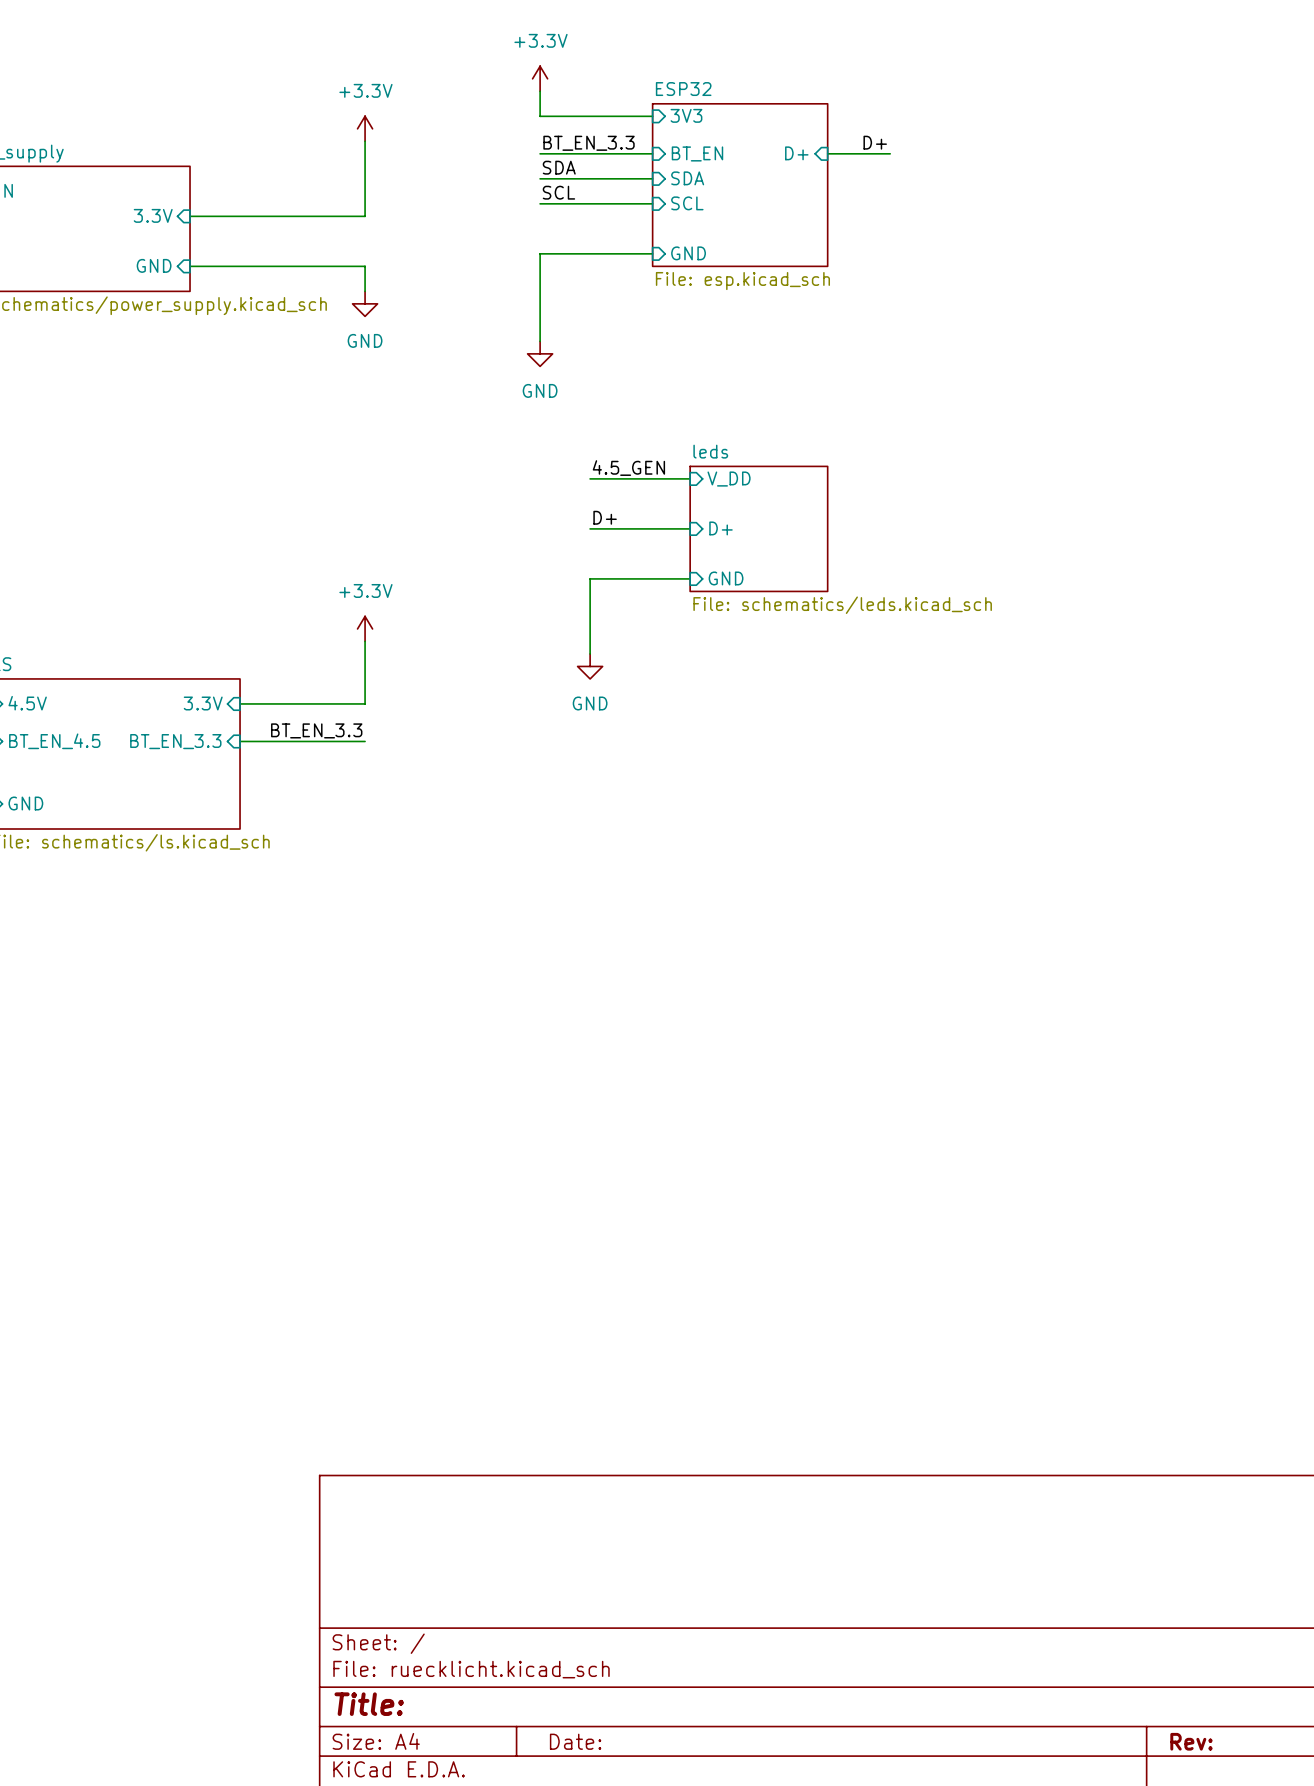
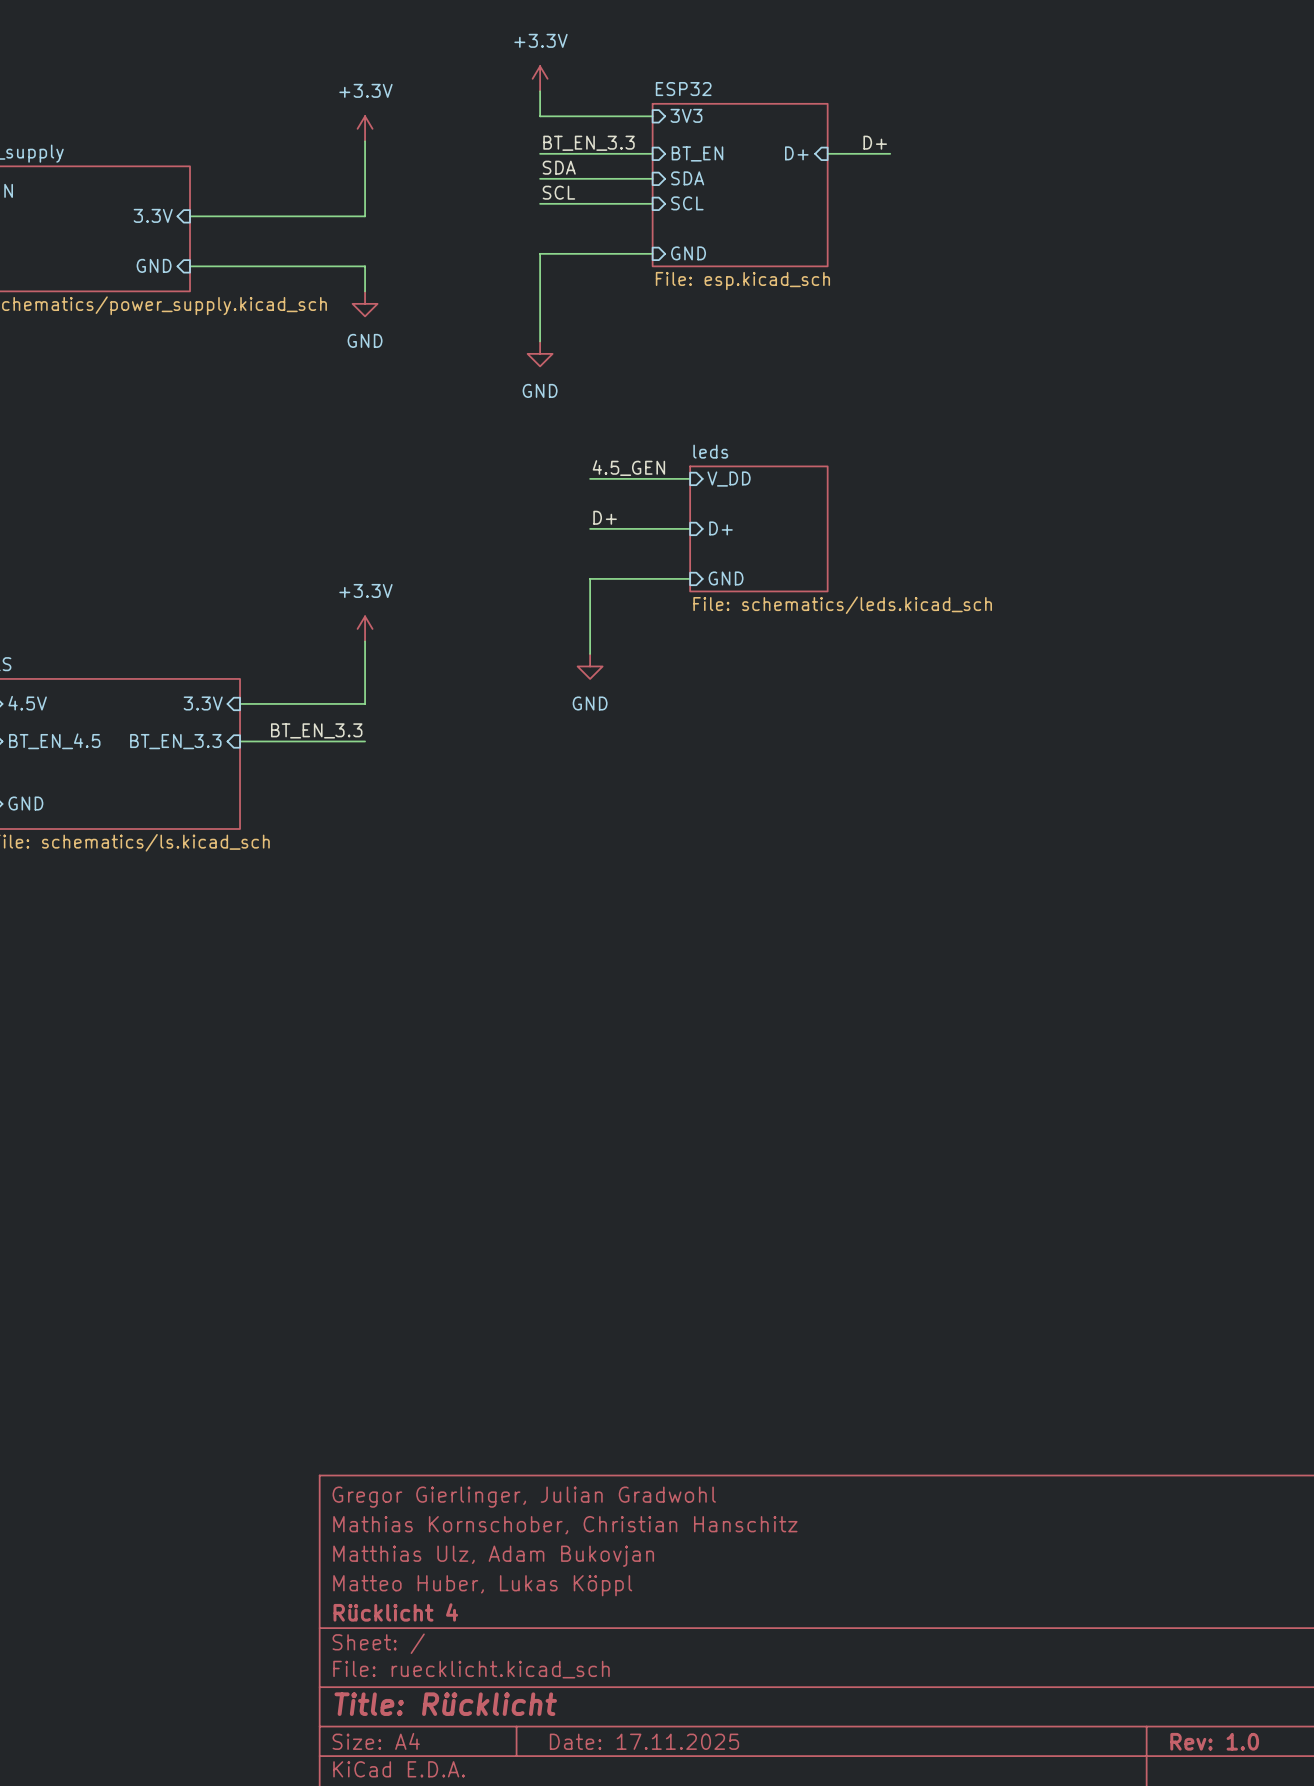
title block: none -> Gregor Gierlinger, Julian Gradwohl (524, 1497)
title block: none -> Mathias Kornschober, Christian Hanschitz (565, 1525)
title block: none -> Matthias Ulz, Adam Bukovjan (493, 1556)
title block: none -> Matteo Huber, Lukas Köppl (482, 1585)
title block: none -> Rücklicht 4 (395, 1612)
title block: Title: (369, 1704) -> Title: Rücklicht (445, 1704)
title block: Date: (575, 1741) -> Date: 17.11.2025 (644, 1741)
title block: Rev: (1191, 1741) -> Rev: 1.0 (1214, 1741)

